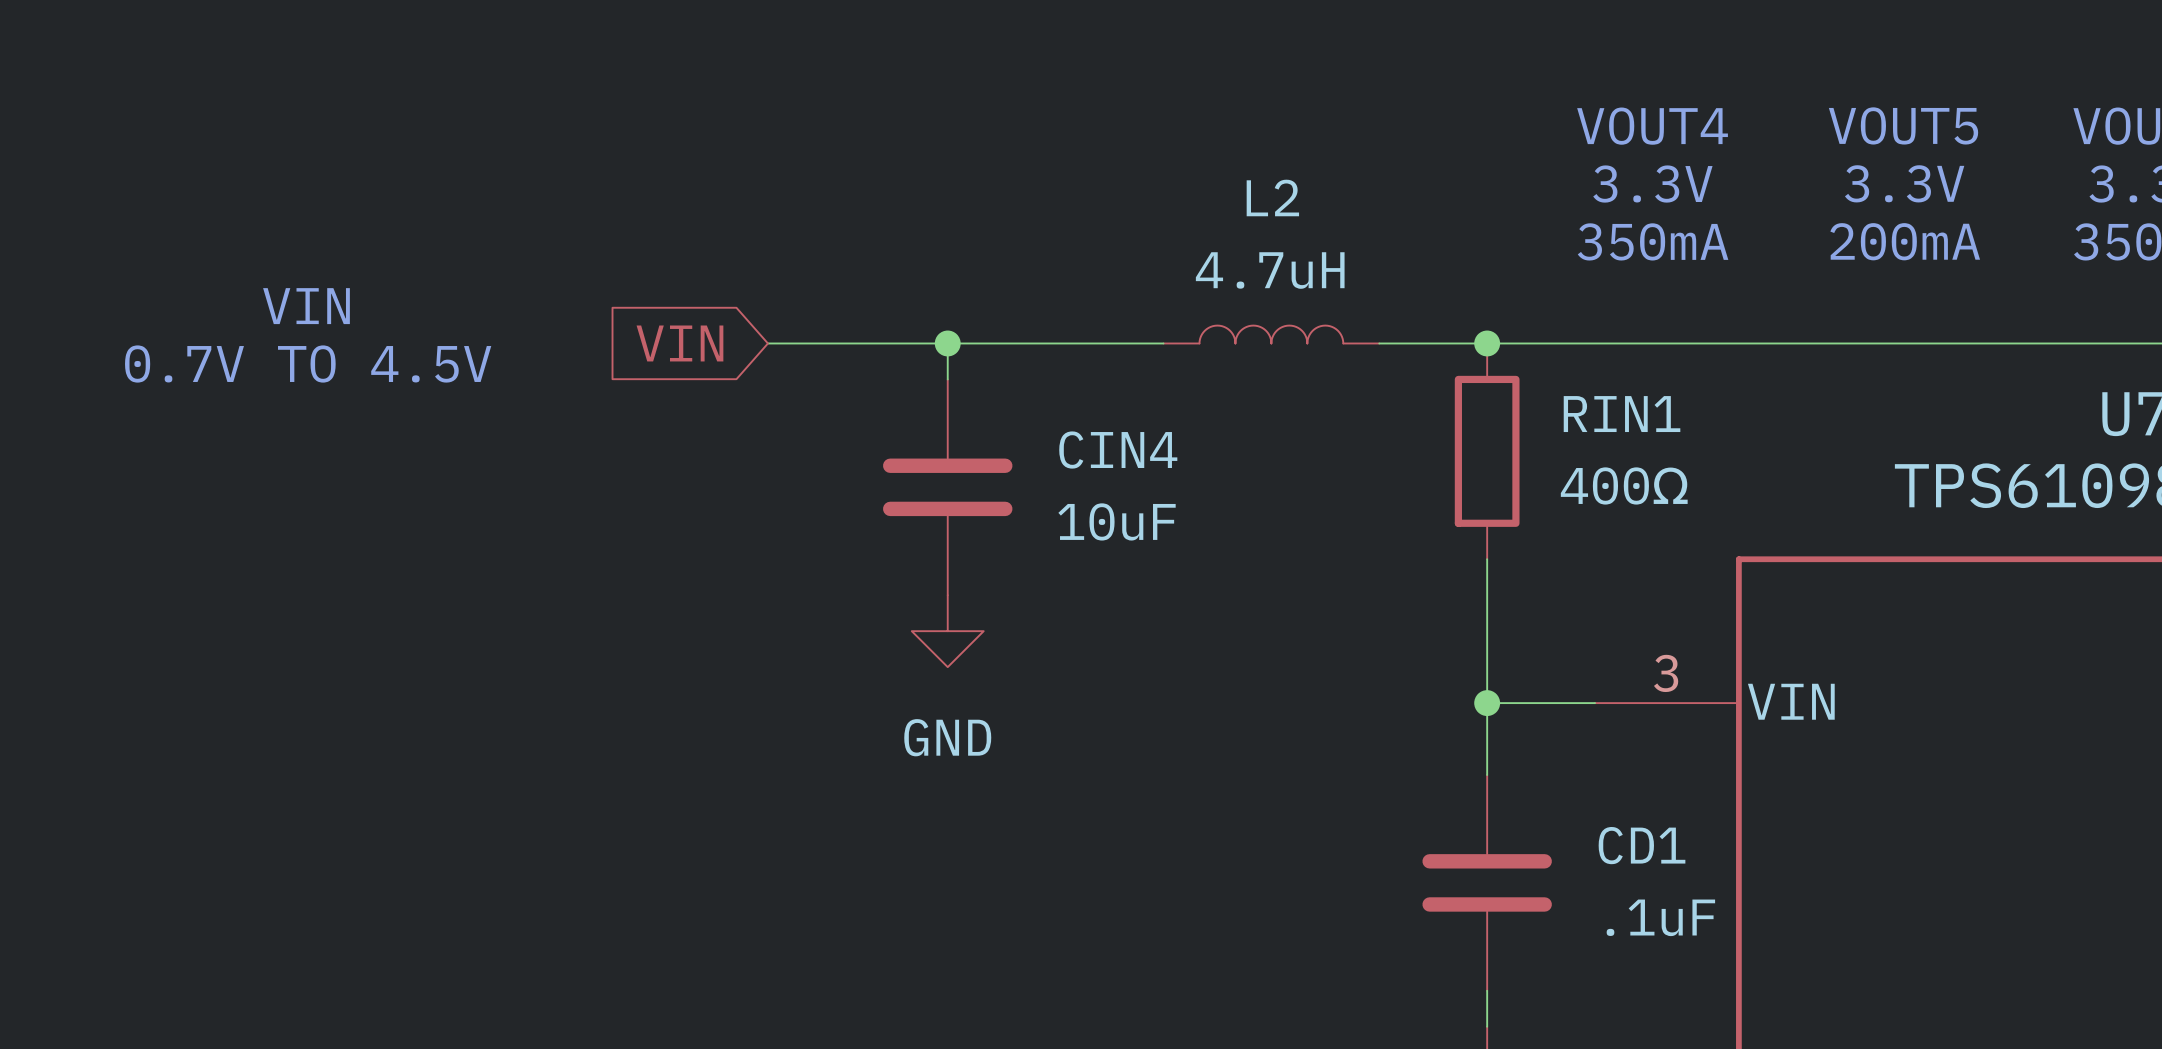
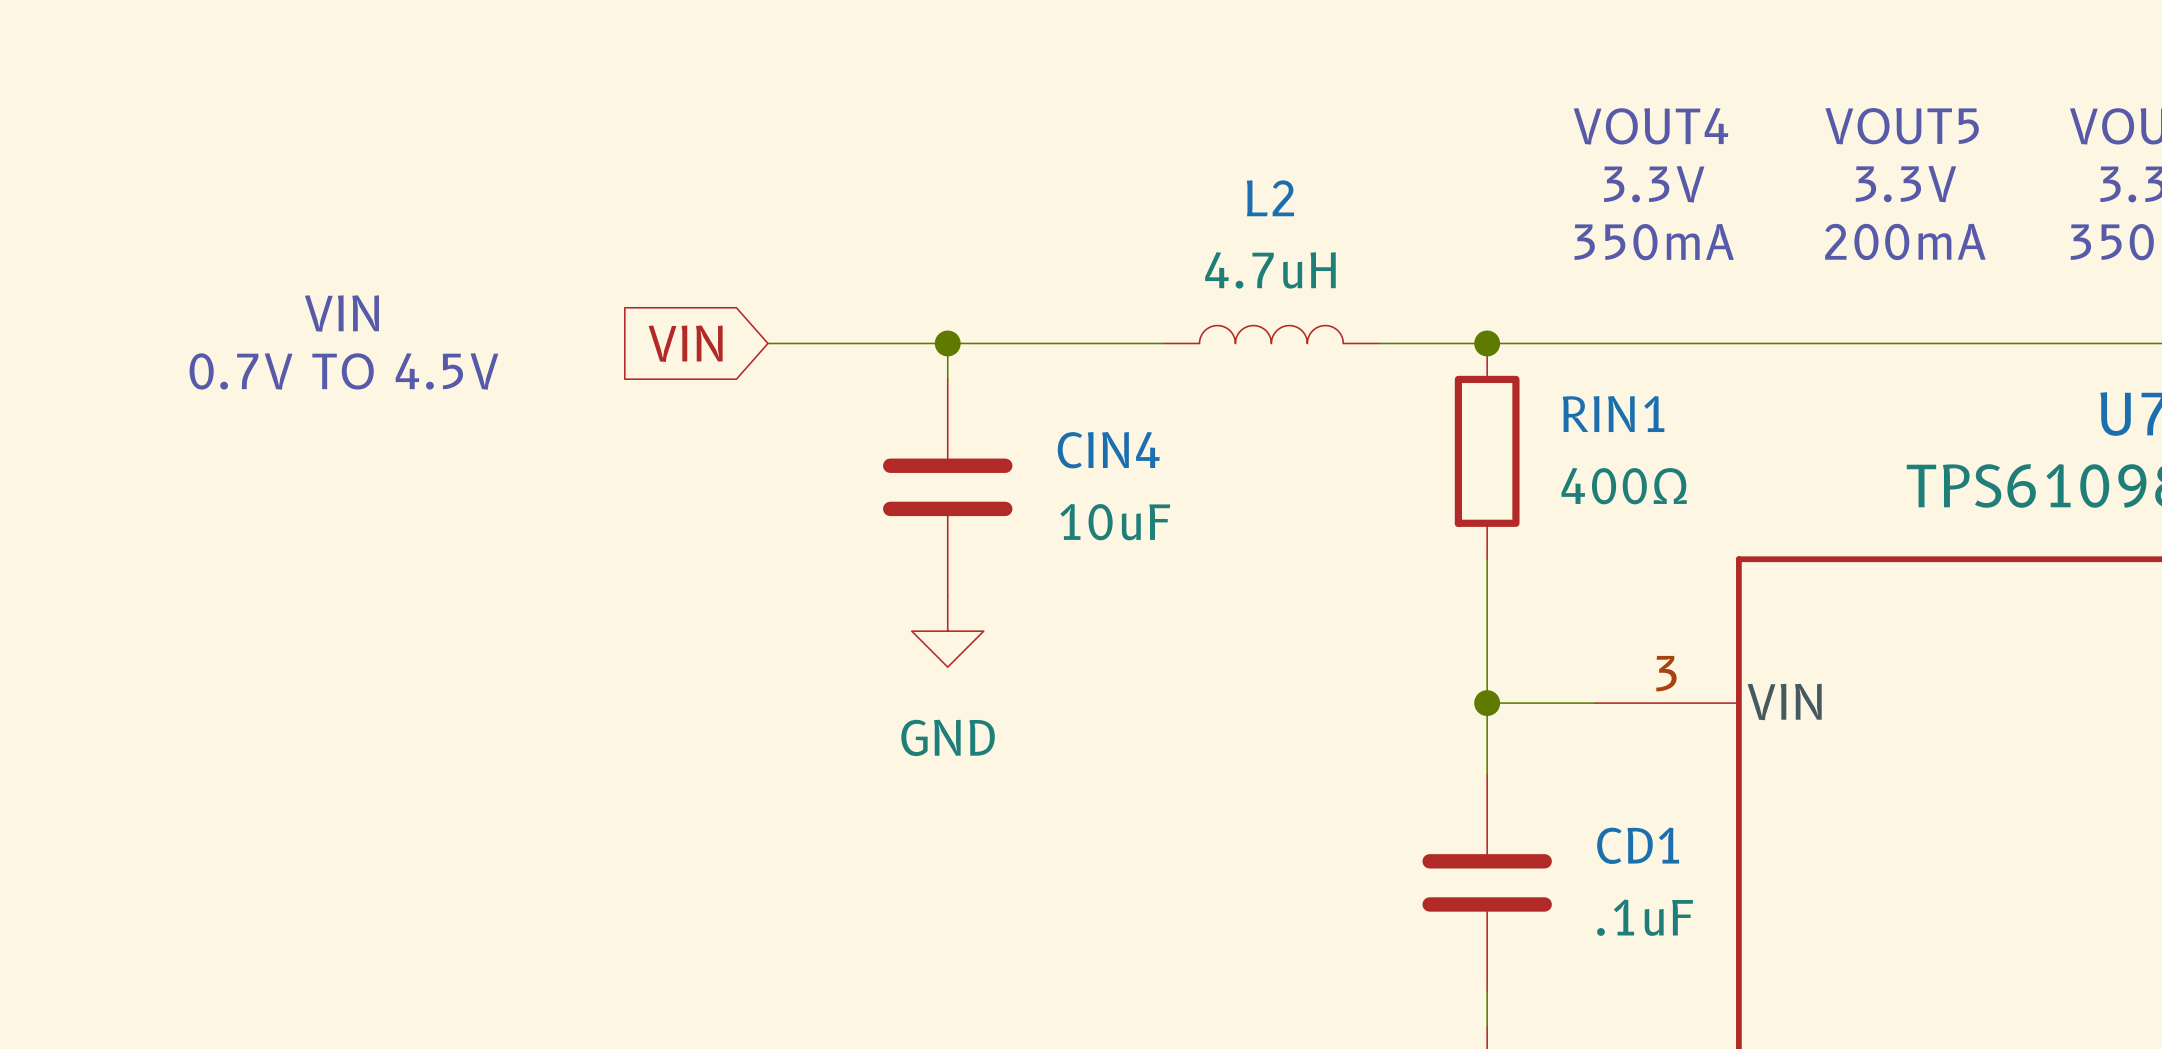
text position: VIN (306, 306) -> VIN (341, 313)
text position: 0.7V TO 4.5V (308, 364) -> 0.7V TO 4.5V (343, 371)

